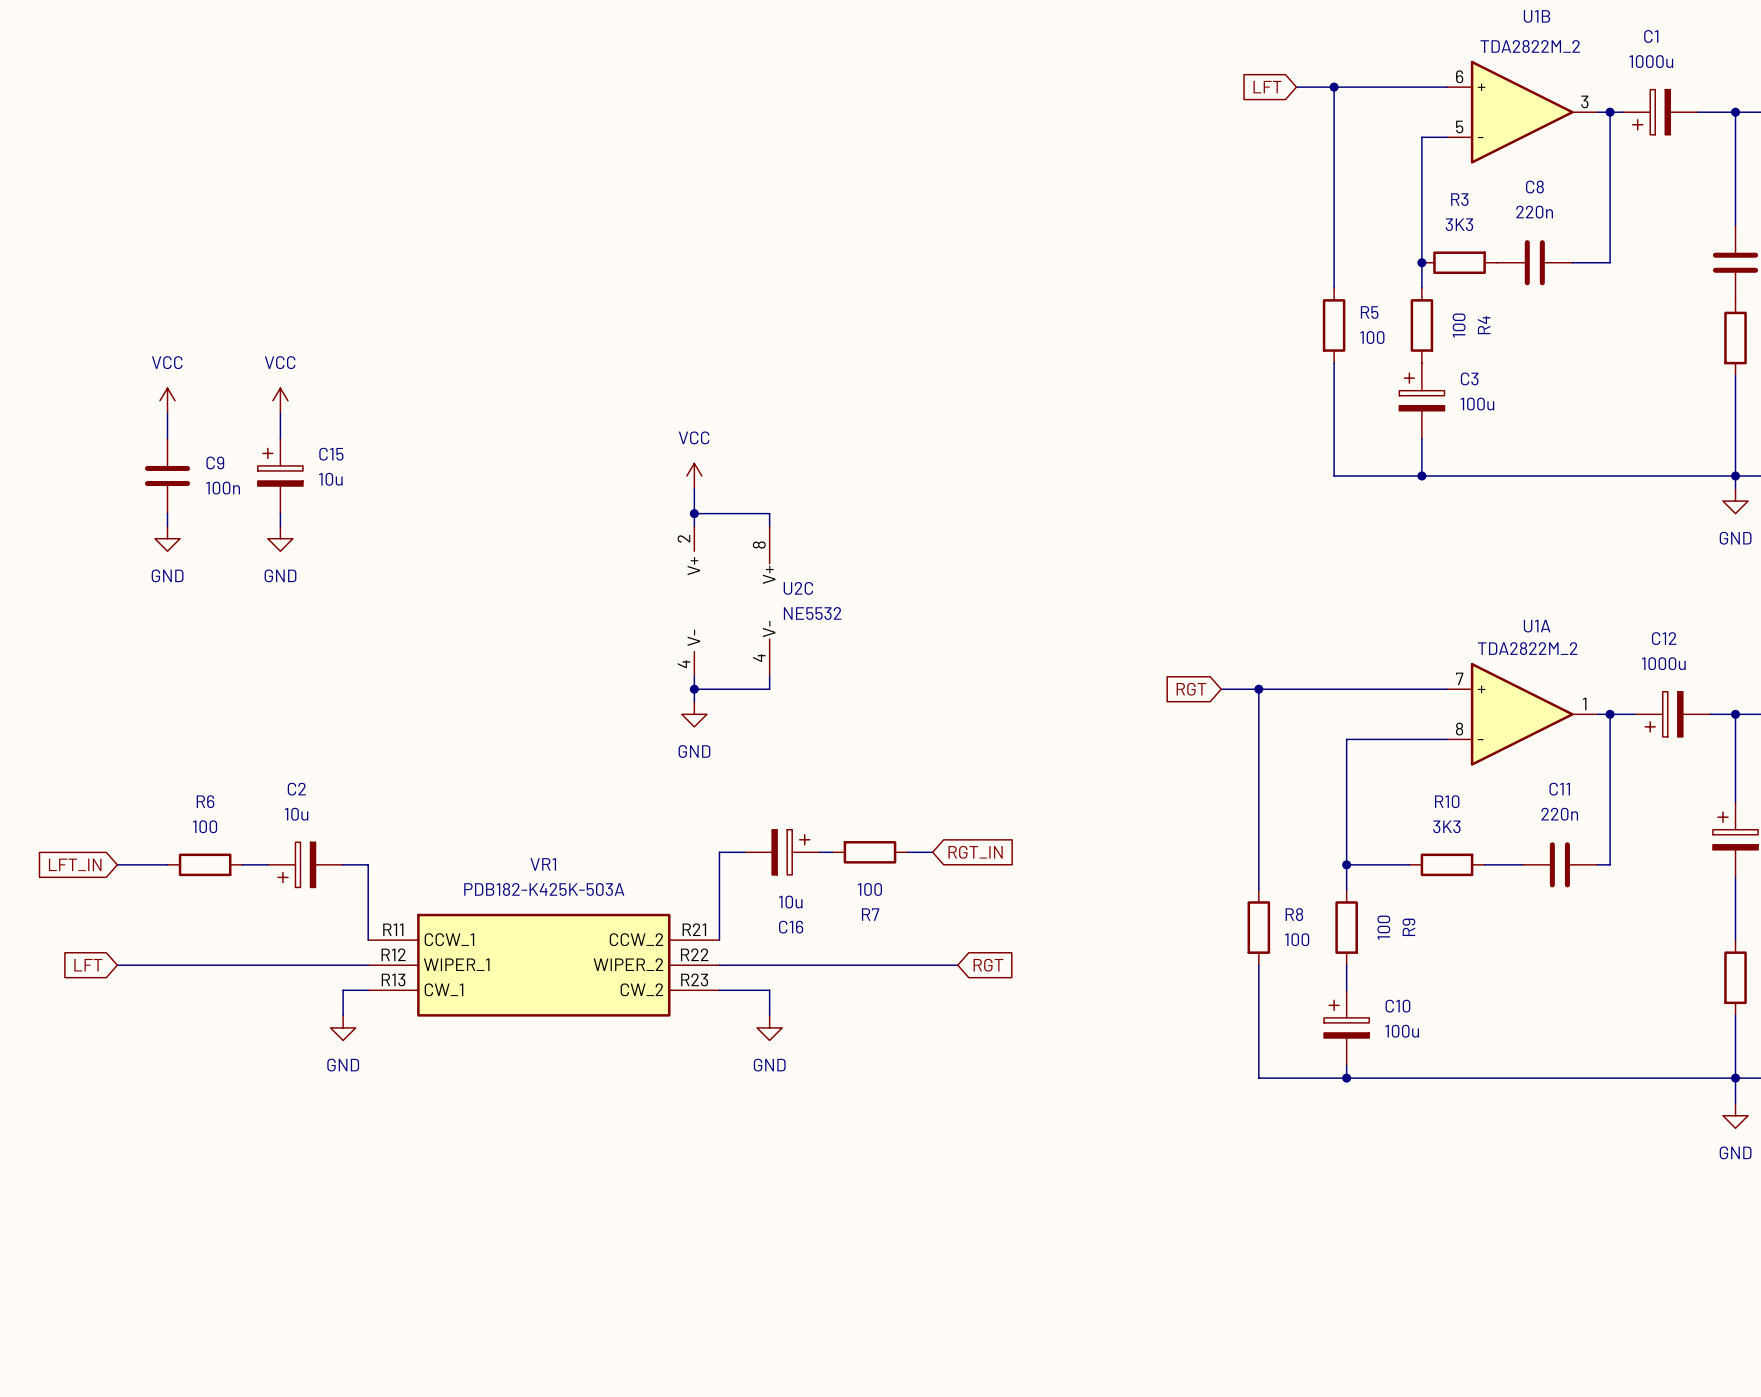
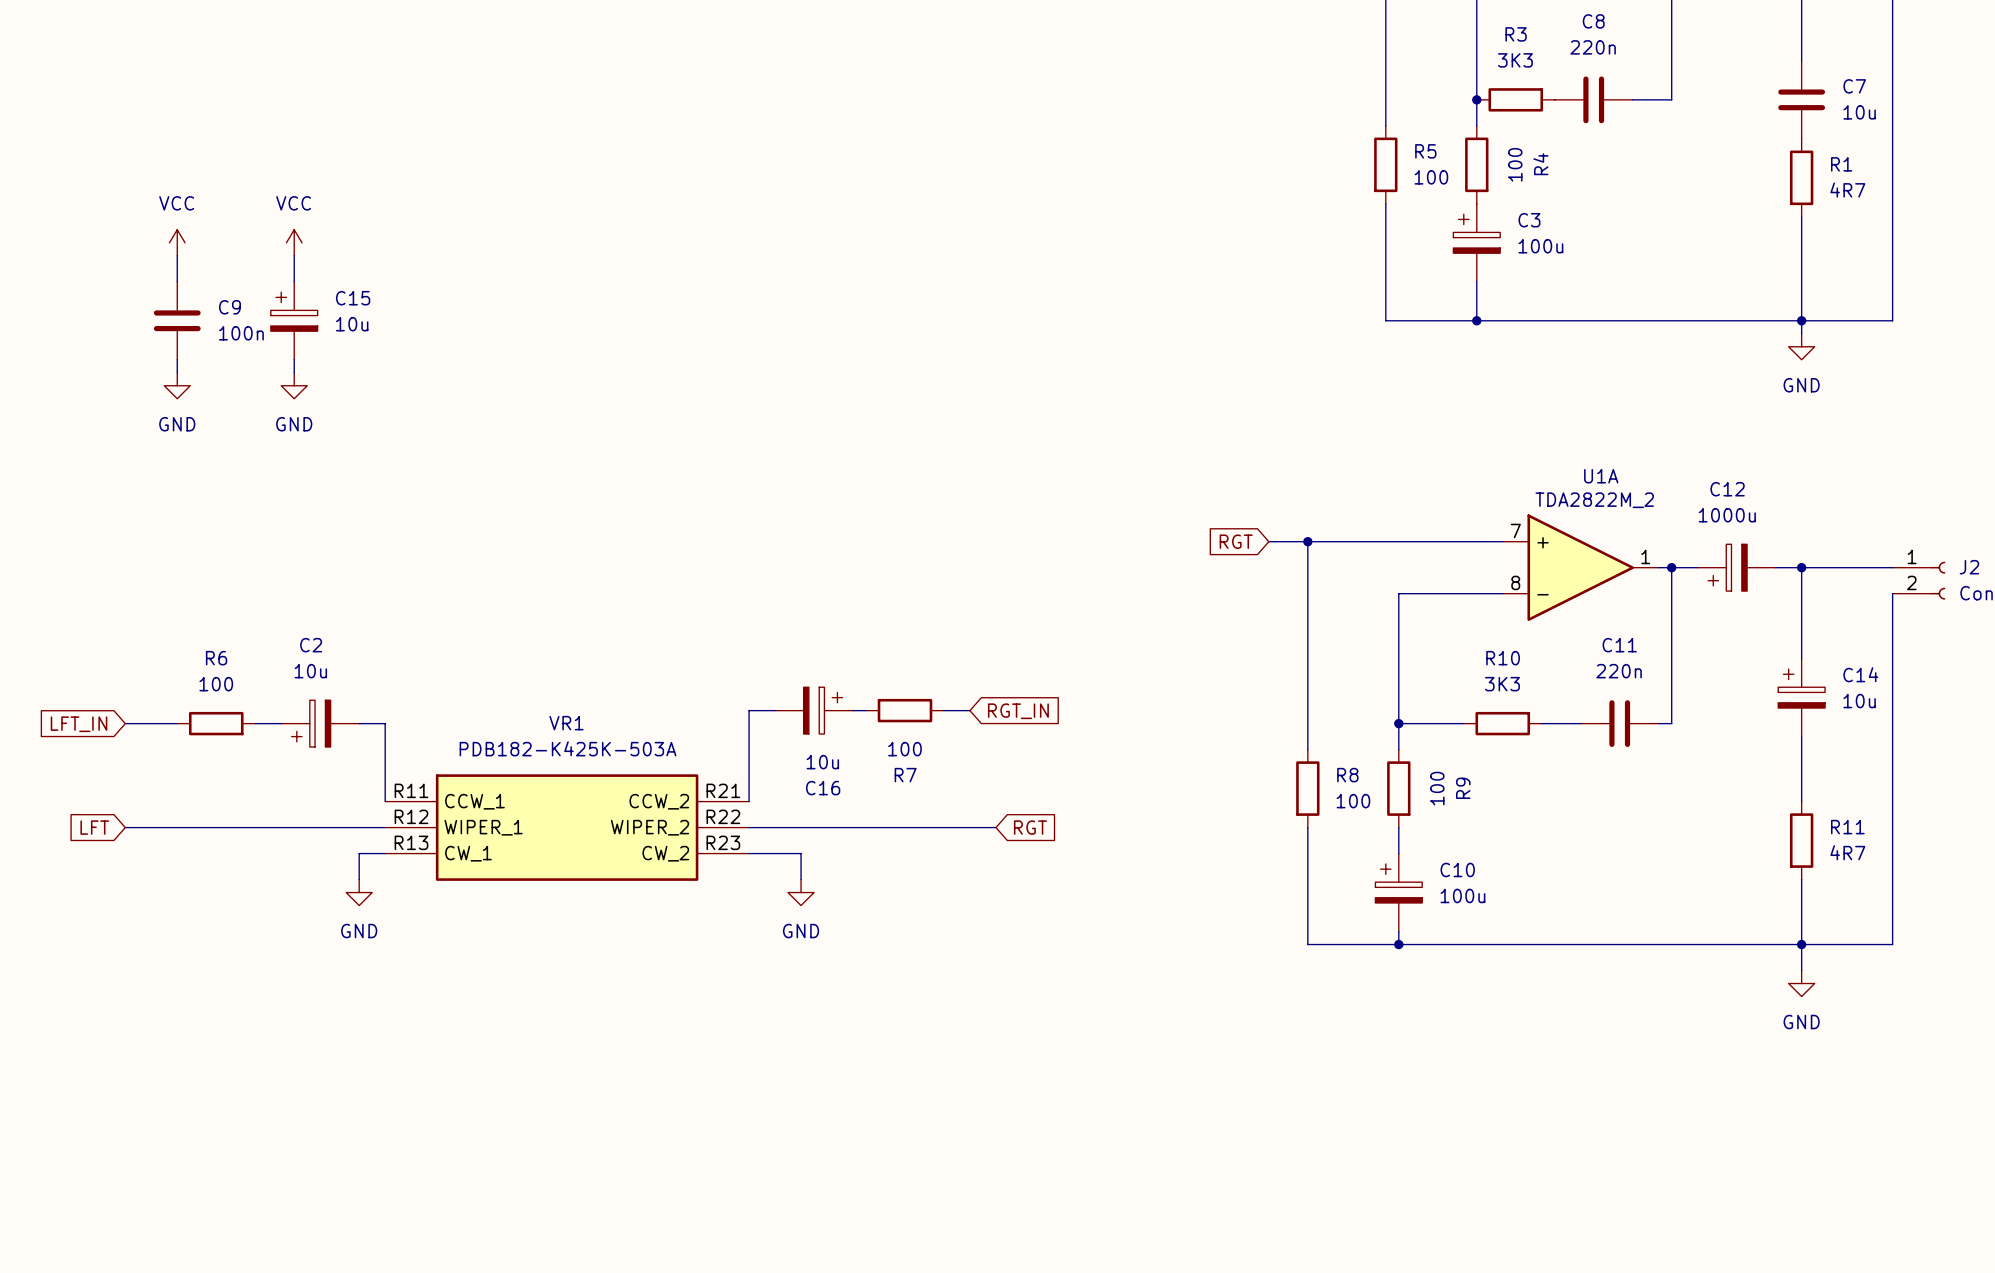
power symbol: VCC (694, 475) -> none
wire: (694, 488) (694, 526) -> none
wire: (694, 513) (769, 513) (769, 526) -> none
junction: (694, 513) -> none
part: (694, 601) -> none
U2C: NE5532 (769, 601) -> none
wire: (694, 676) (694, 701) -> none
wire: (769, 676) (769, 689) (694, 689) -> none
junction: (694, 689) -> none
power symbol: GND (694, 714) -> none

